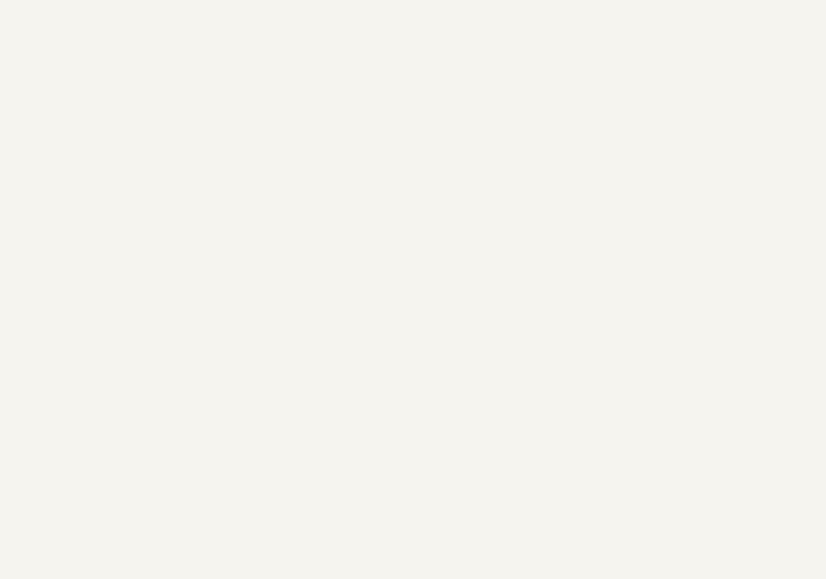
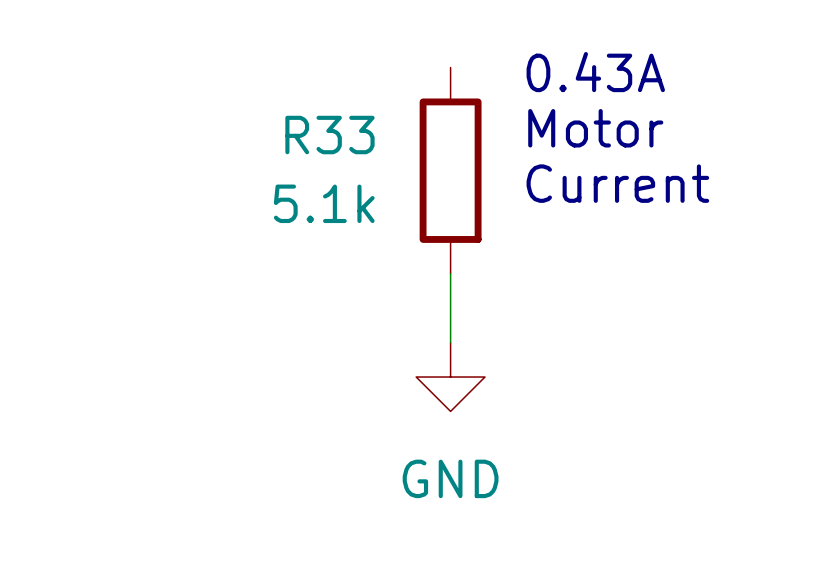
text: none -> 0.43A (595, 72)
text: none -> Motor (595, 128)
R33: none -> 5.1k (450, 170)
text: none -> Current (617, 183)
wire: none -> (450, 273) (450, 342)
power symbol: none -> GND (450, 377)

